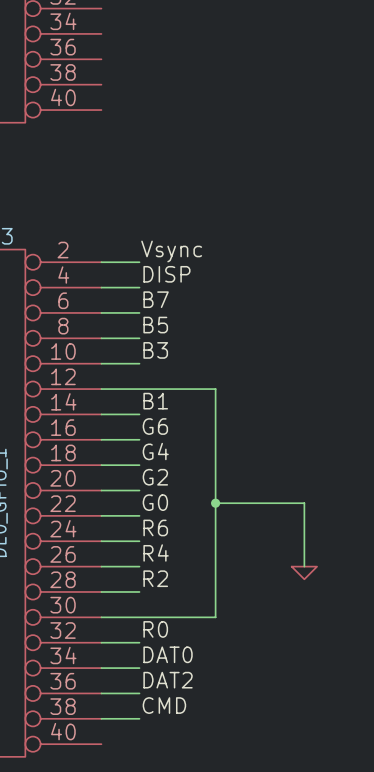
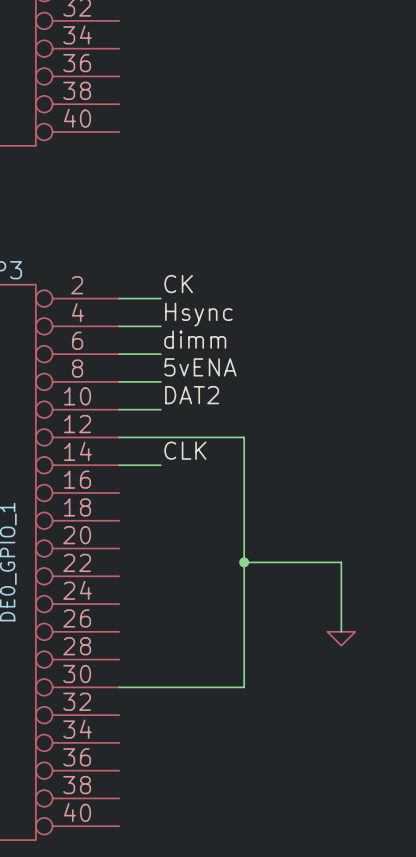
label: Vsync (171, 251) -> CK (178, 284)
label: DISP (166, 274) -> Hsync (198, 314)
label: B7 (156, 299) -> dimm (195, 339)
label: B5 (155, 325) -> 5vENA (200, 367)
label: B3 (155, 350) -> DAT2 (192, 395)
label: B1 (155, 401) -> CLK (185, 450)
label: G6 (155, 426) -> none
wire: (101, 439) (139, 439) -> none
label: G4 (155, 451) -> none
wire: (101, 465) (139, 465) -> none
label: G2 (155, 477) -> none
wire: (101, 490) (139, 490) -> none
label: G0 (155, 502) -> none
wire: (101, 515) (139, 515) -> none
label: R6 (155, 527) -> none
wire: (101, 541) (139, 541) -> none
label: R4 (156, 552) -> none
wire: (101, 566) (139, 566) -> none
label: R2 (155, 578) -> none
wire: (101, 591) (139, 591) -> none
label: R0 (155, 629) -> none
wire: (101, 642) (139, 642) -> none
label: DAT0 (168, 654) -> none
wire: (101, 668) (139, 668) -> none
label: DAT2 (168, 680) -> none
wire: (101, 693) (139, 693) -> none
label: CMD (164, 705) -> none
wire: (101, 718) (139, 718) -> none

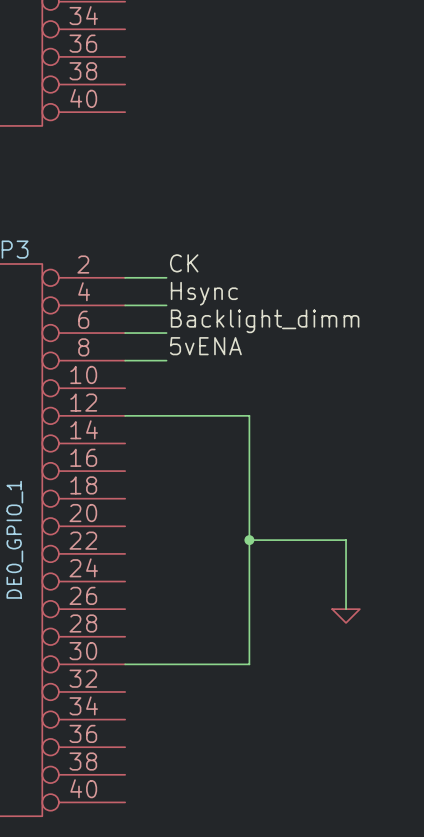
label: dimm (195, 339) -> Backlight_dimm (265, 321)
label: DAT2 (192, 395) -> none
wire: (119, 409) (160, 409) -> none
label: CLK (185, 450) -> none
wire: (119, 465) (160, 465) -> none

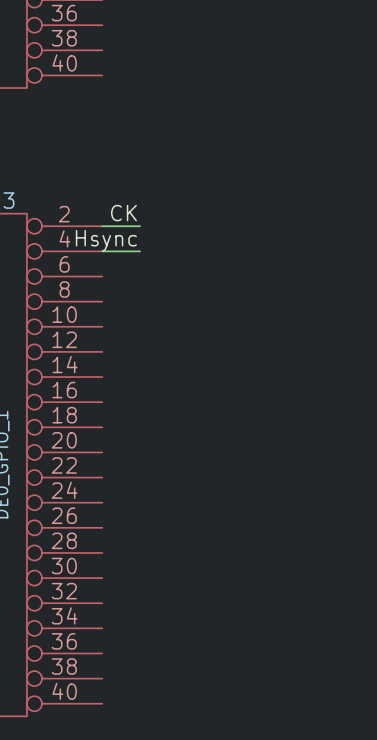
label position: CK (184, 263) -> CK (123, 213)
label position: Hsync (204, 293) -> Hsync (106, 240)
label: Backlight_dimm (265, 321) -> none
wire: (125, 333) (166, 333) -> none
label: 5vENA (205, 346) -> none
wire: (125, 360) (166, 360) -> none
wire: (125, 415) (249, 415) (249, 664) (125, 664) -> none
wire: (249, 540) (346, 540) (346, 609) -> none
junction: (249, 540) -> none
power symbol: (346, 616) -> none

